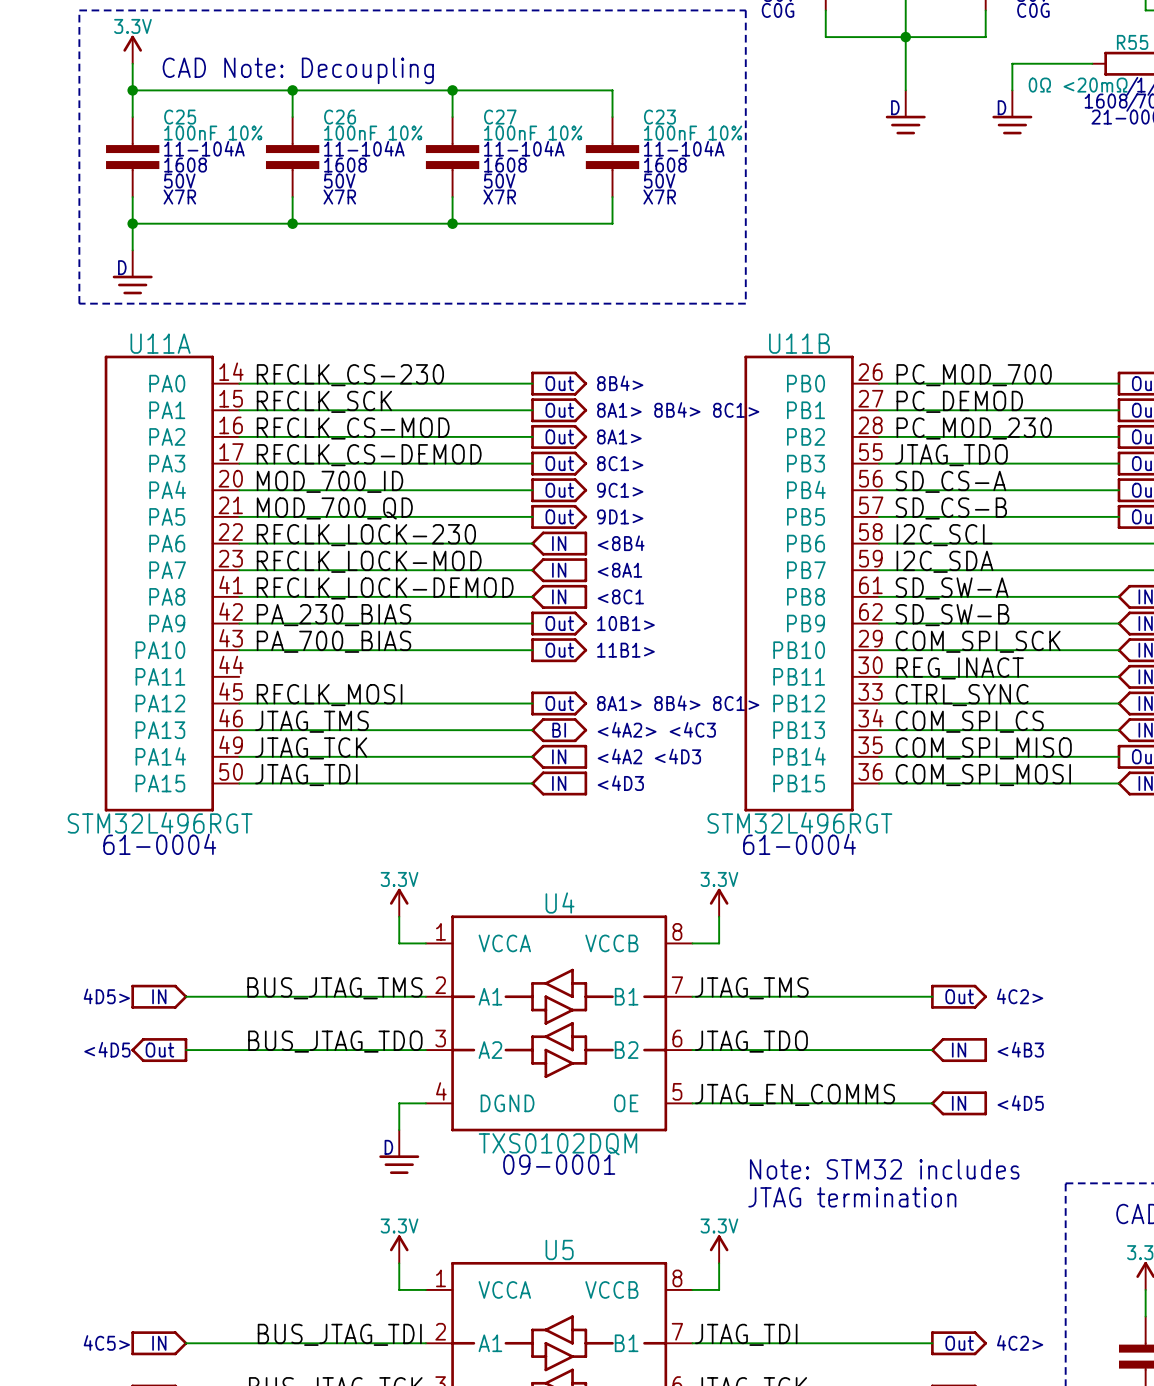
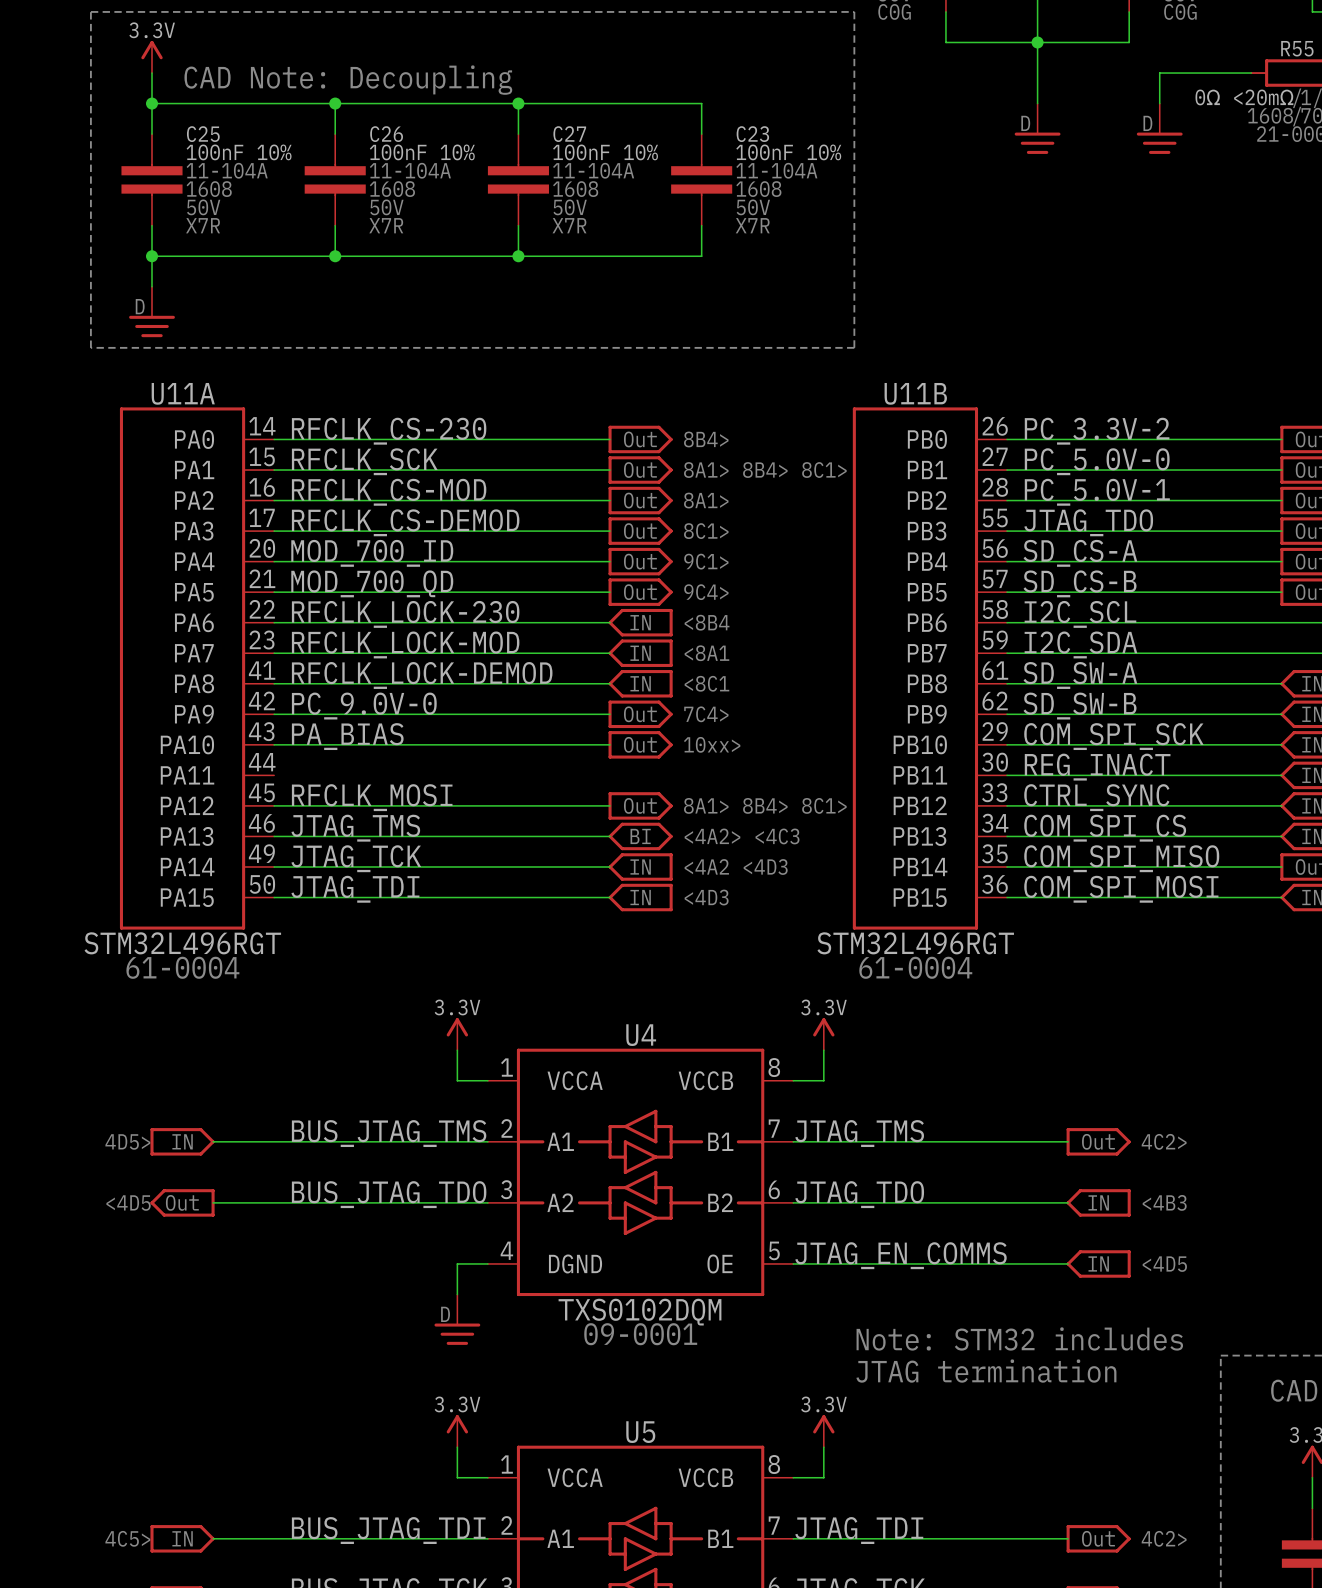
label: PC_MOD_700 (974, 375) -> PC_3.3V-2 (1097, 431)
label: PC_DEMOD (959, 401) -> PC_5.0V-0 (1097, 461)
label: PC_MOD_230 (974, 428) -> PC_5.0V-1 (1097, 492)
text: 9D1> (620, 516) -> 9C4> (706, 592)
label: PA_230_BIAS (333, 615) -> PC_9.0V-0 (364, 706)
text: 10B1> (625, 623) -> 7C4> (706, 714)
label: PA_700_BIAS (333, 641) -> PA_BIAS (347, 736)
text: 11B1> (625, 650) -> 10xx> (712, 744)

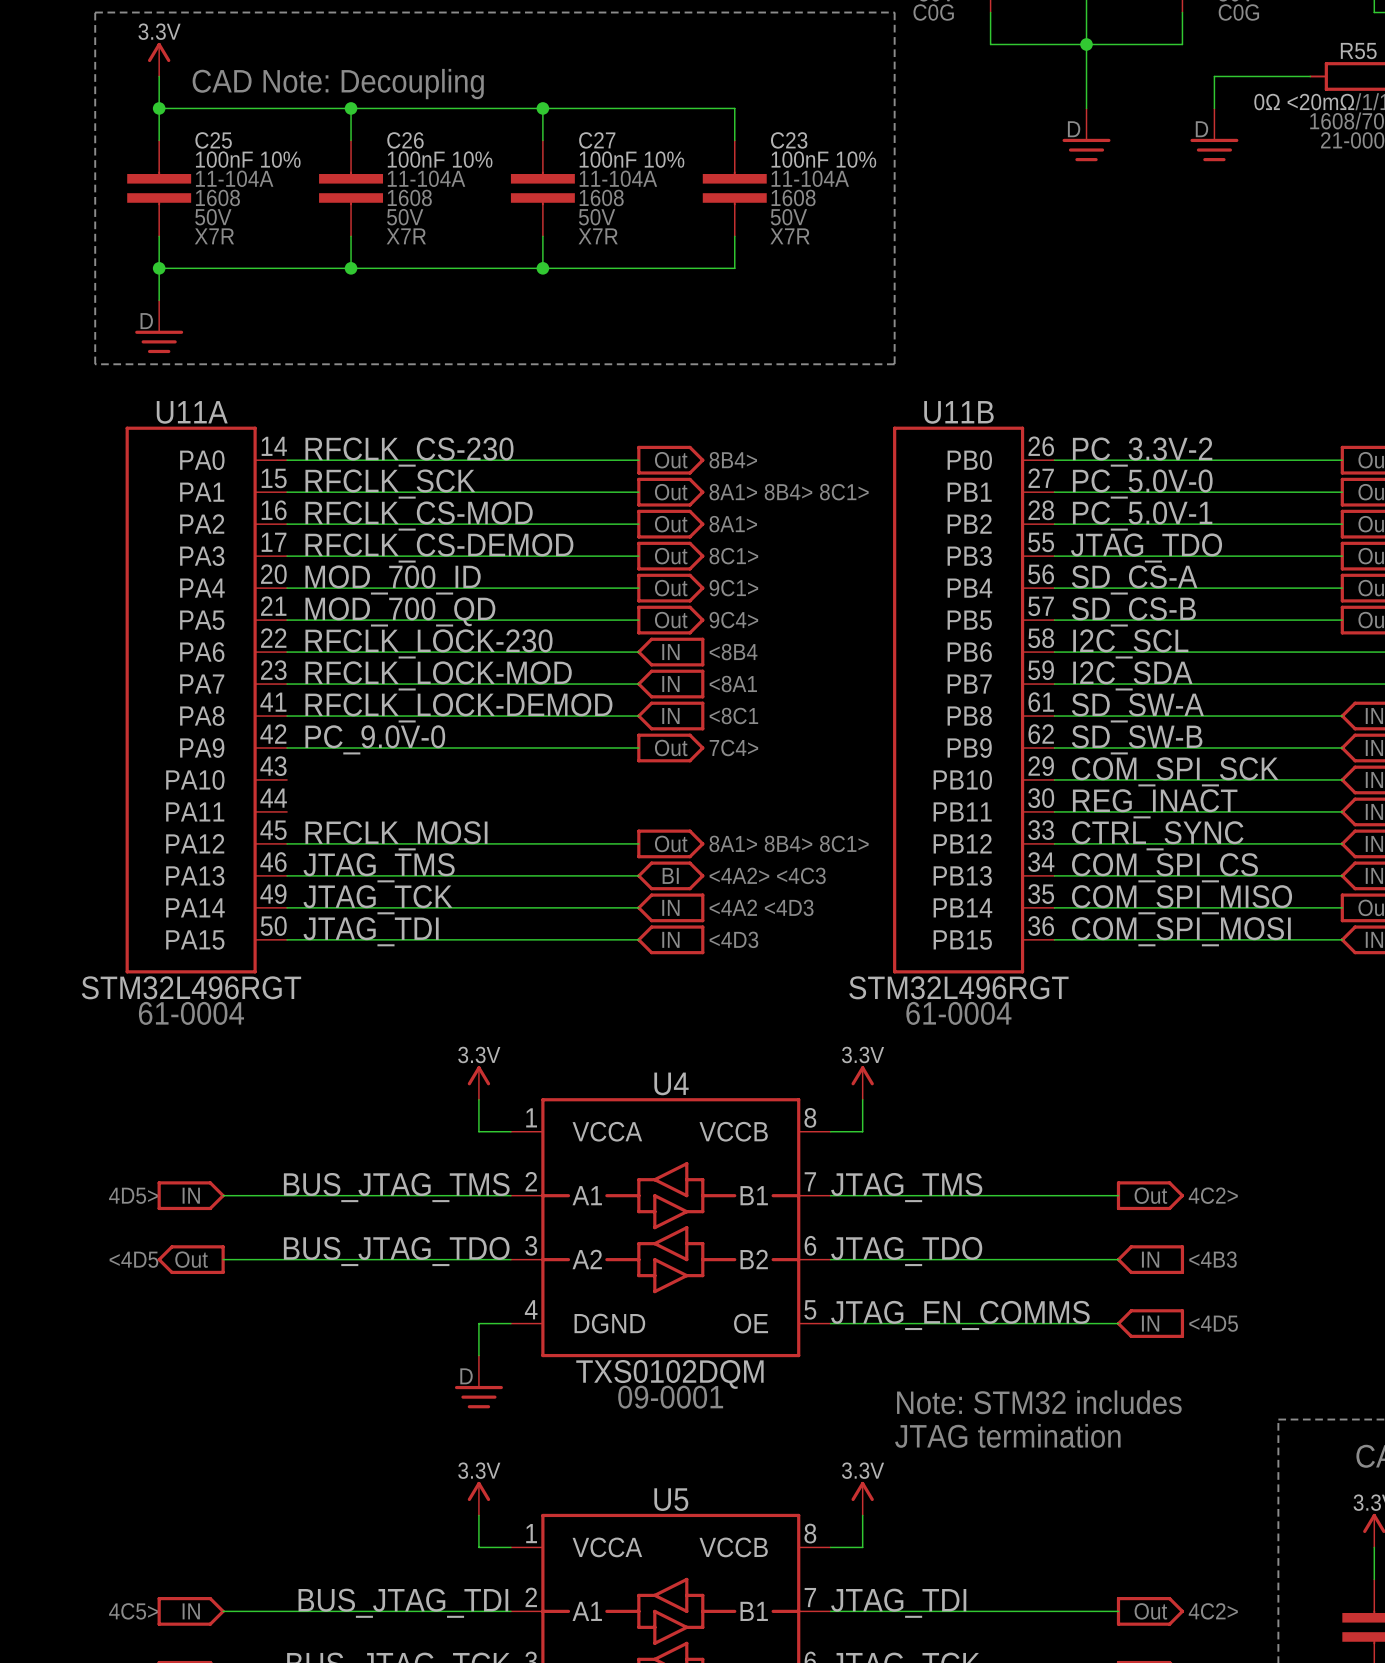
label: PA_BIAS (347, 736) -> none
wire: (274, 744) (610, 744) -> none
part: (640, 744) -> none
text: 10xx> (712, 744) -> none

